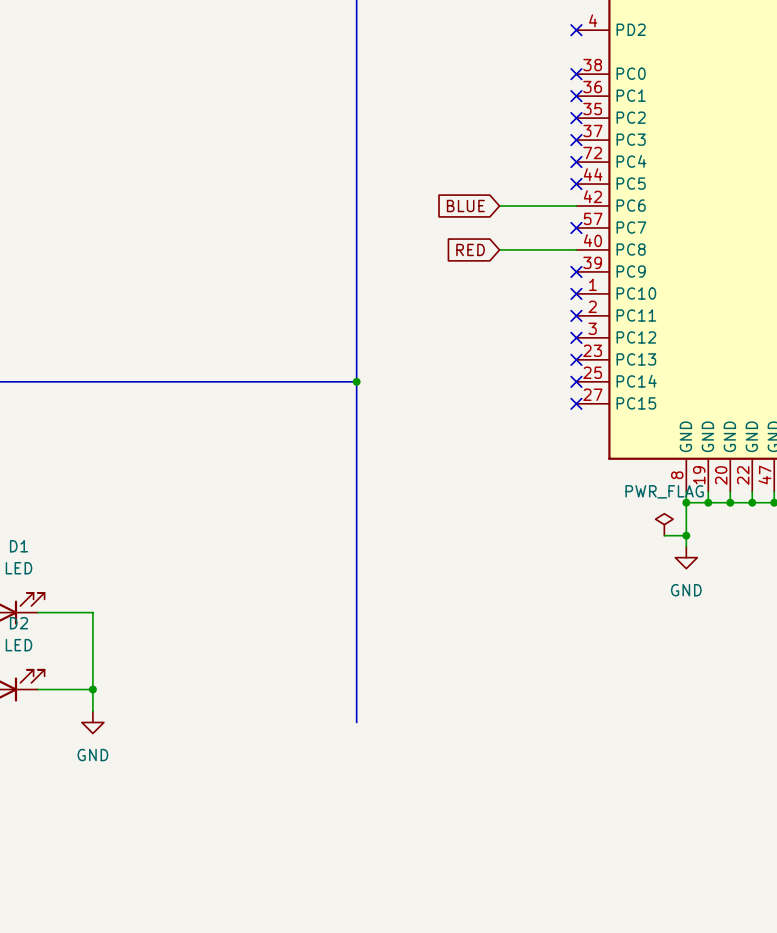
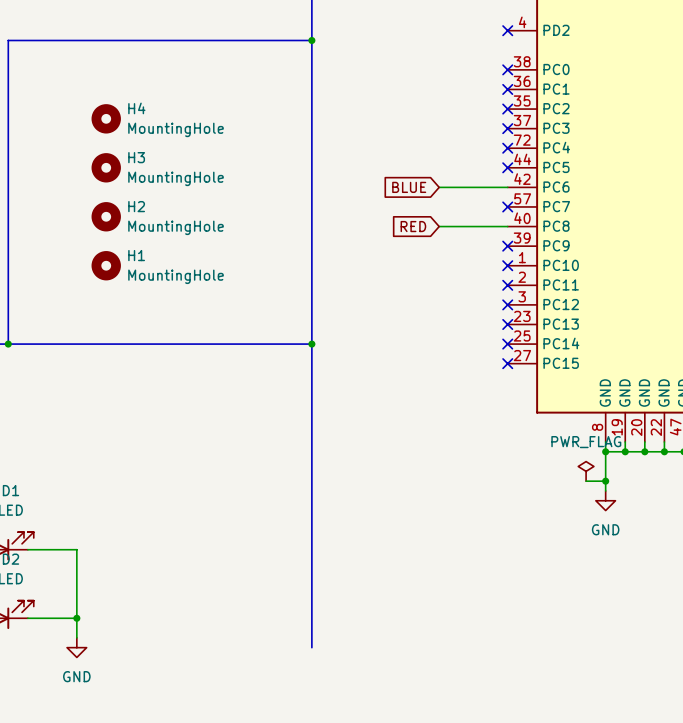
bus: none -> (311, 40) (8, 40) (8, 344)
junction: none -> (311, 40)
H4: none -> MountingHole (106, 118)
H3: none -> MountingHole (106, 167)
H2: none -> MountingHole (106, 216)
H1: none -> MountingHole (106, 265)
junction: none -> (8, 344)

